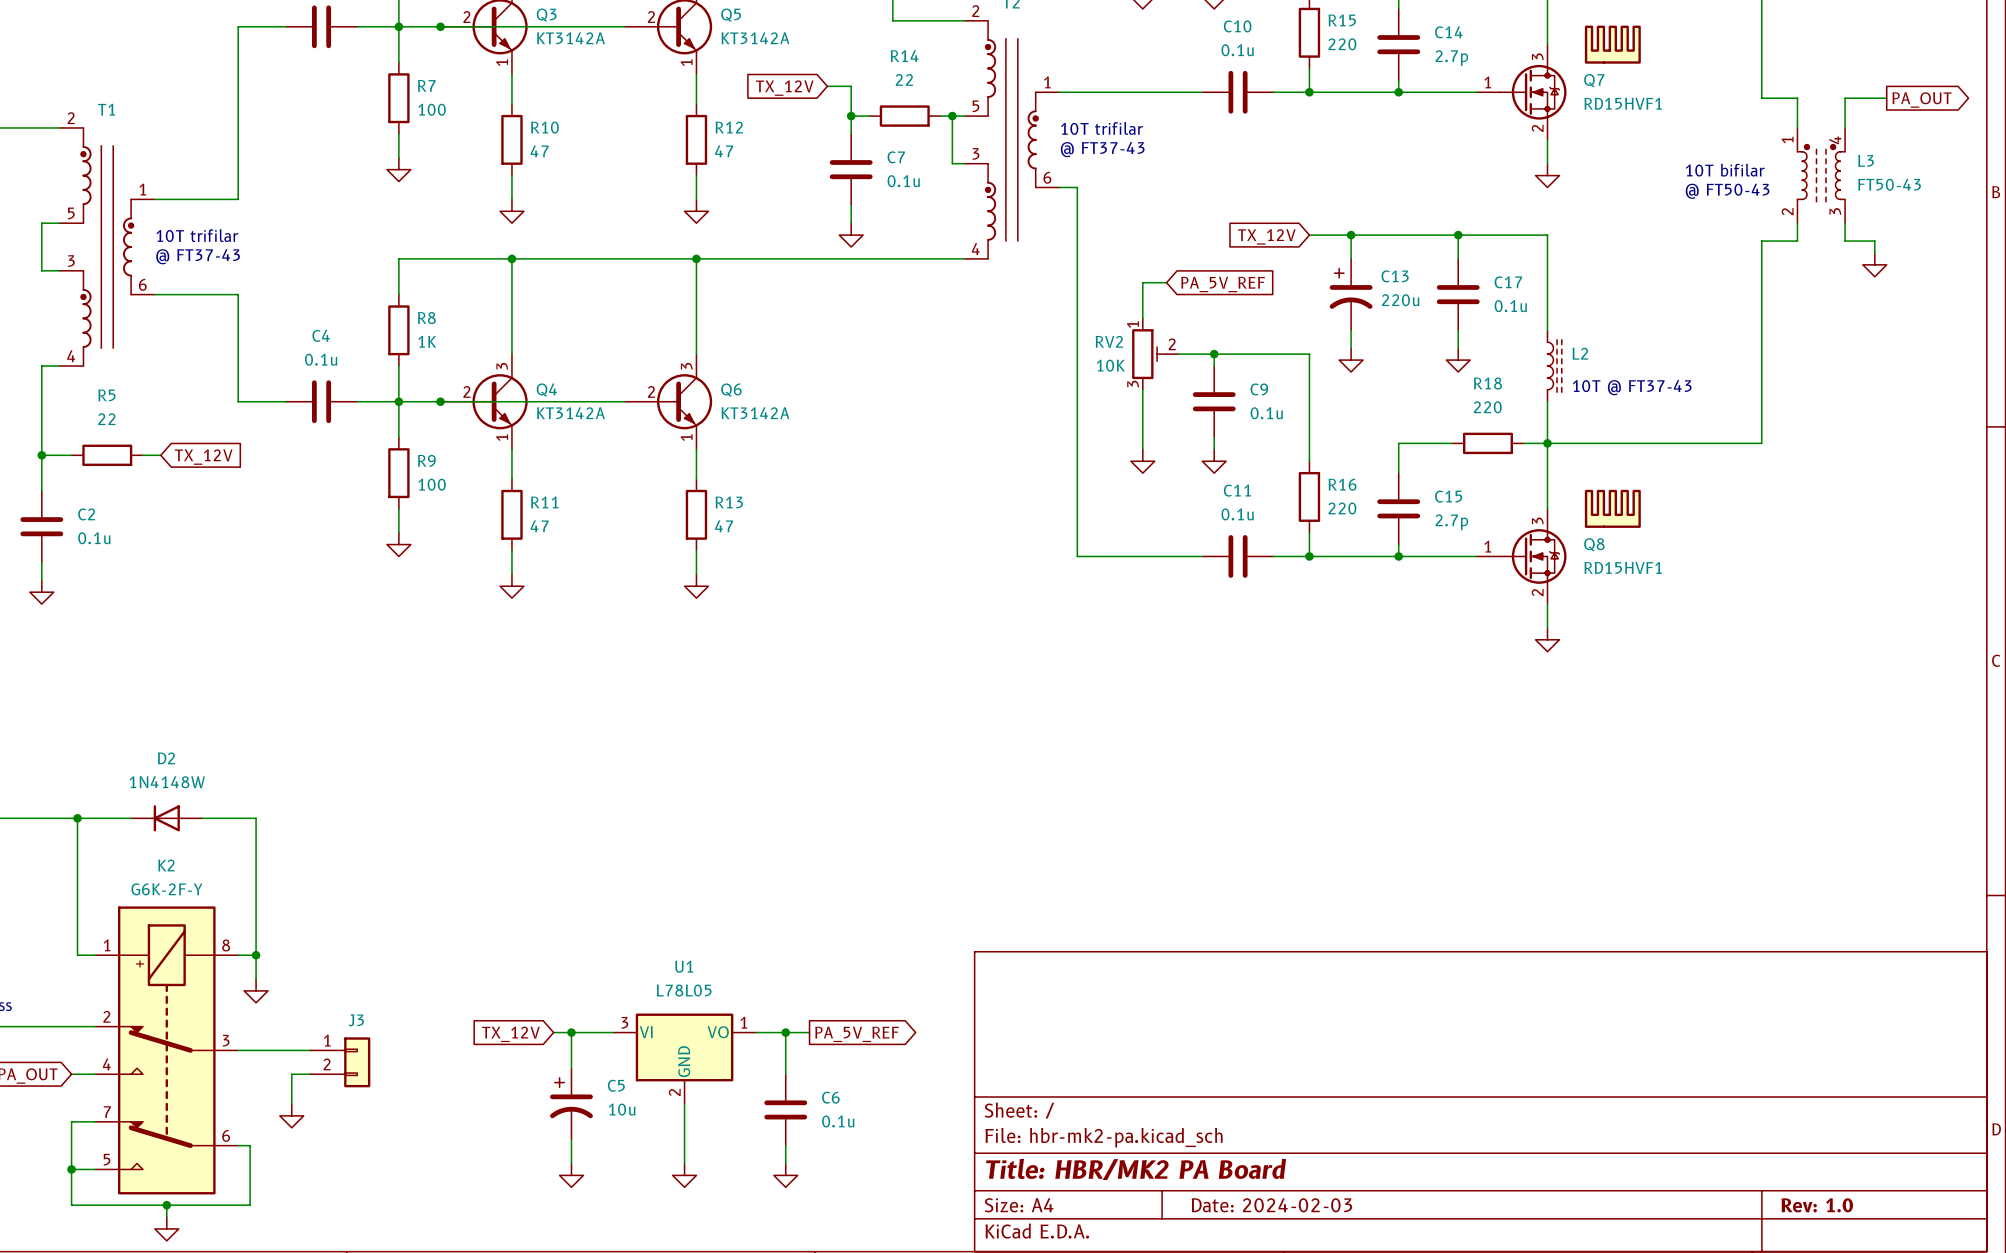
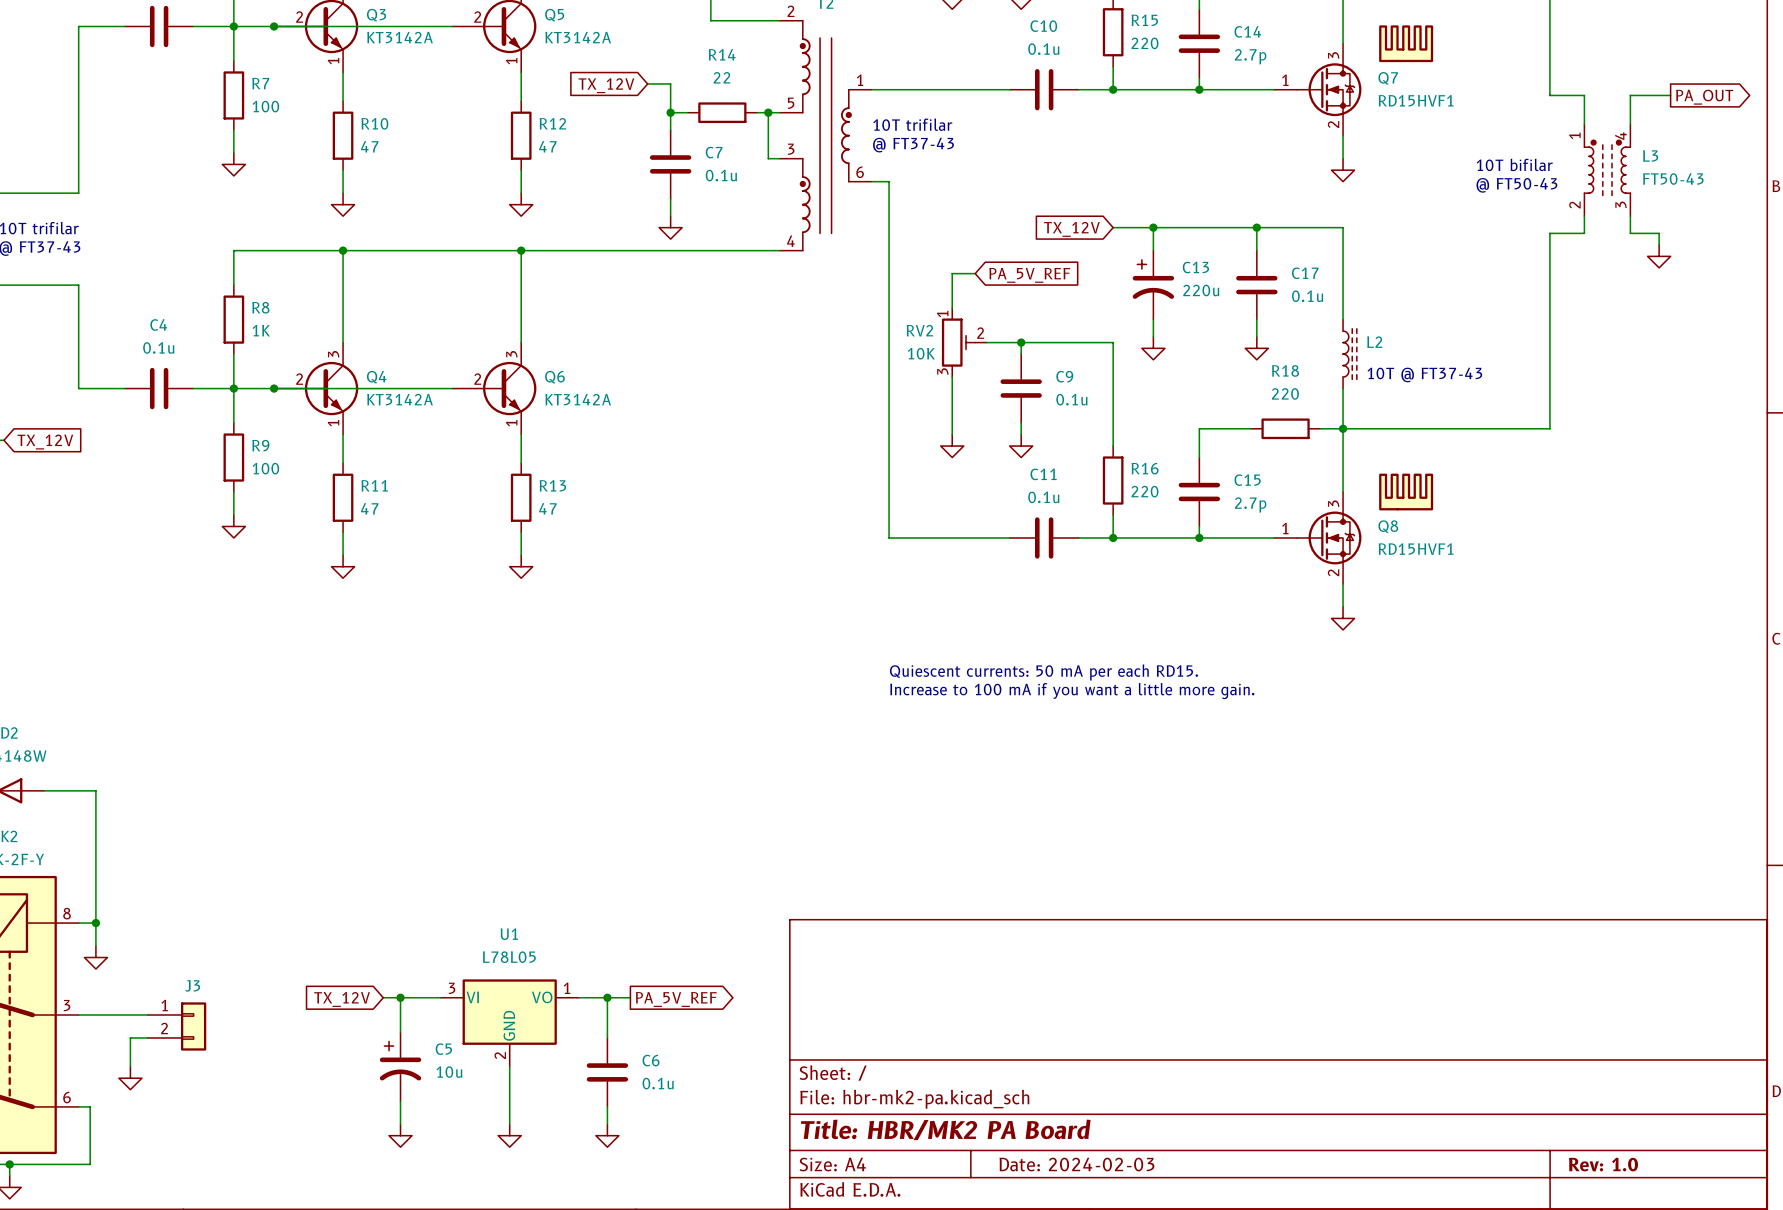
text: none -> Quiescent currents: 50 mA per each RD15. (1043, 672)
text: none -> Increase to 100 mA if you want a little more gain. (1072, 691)

